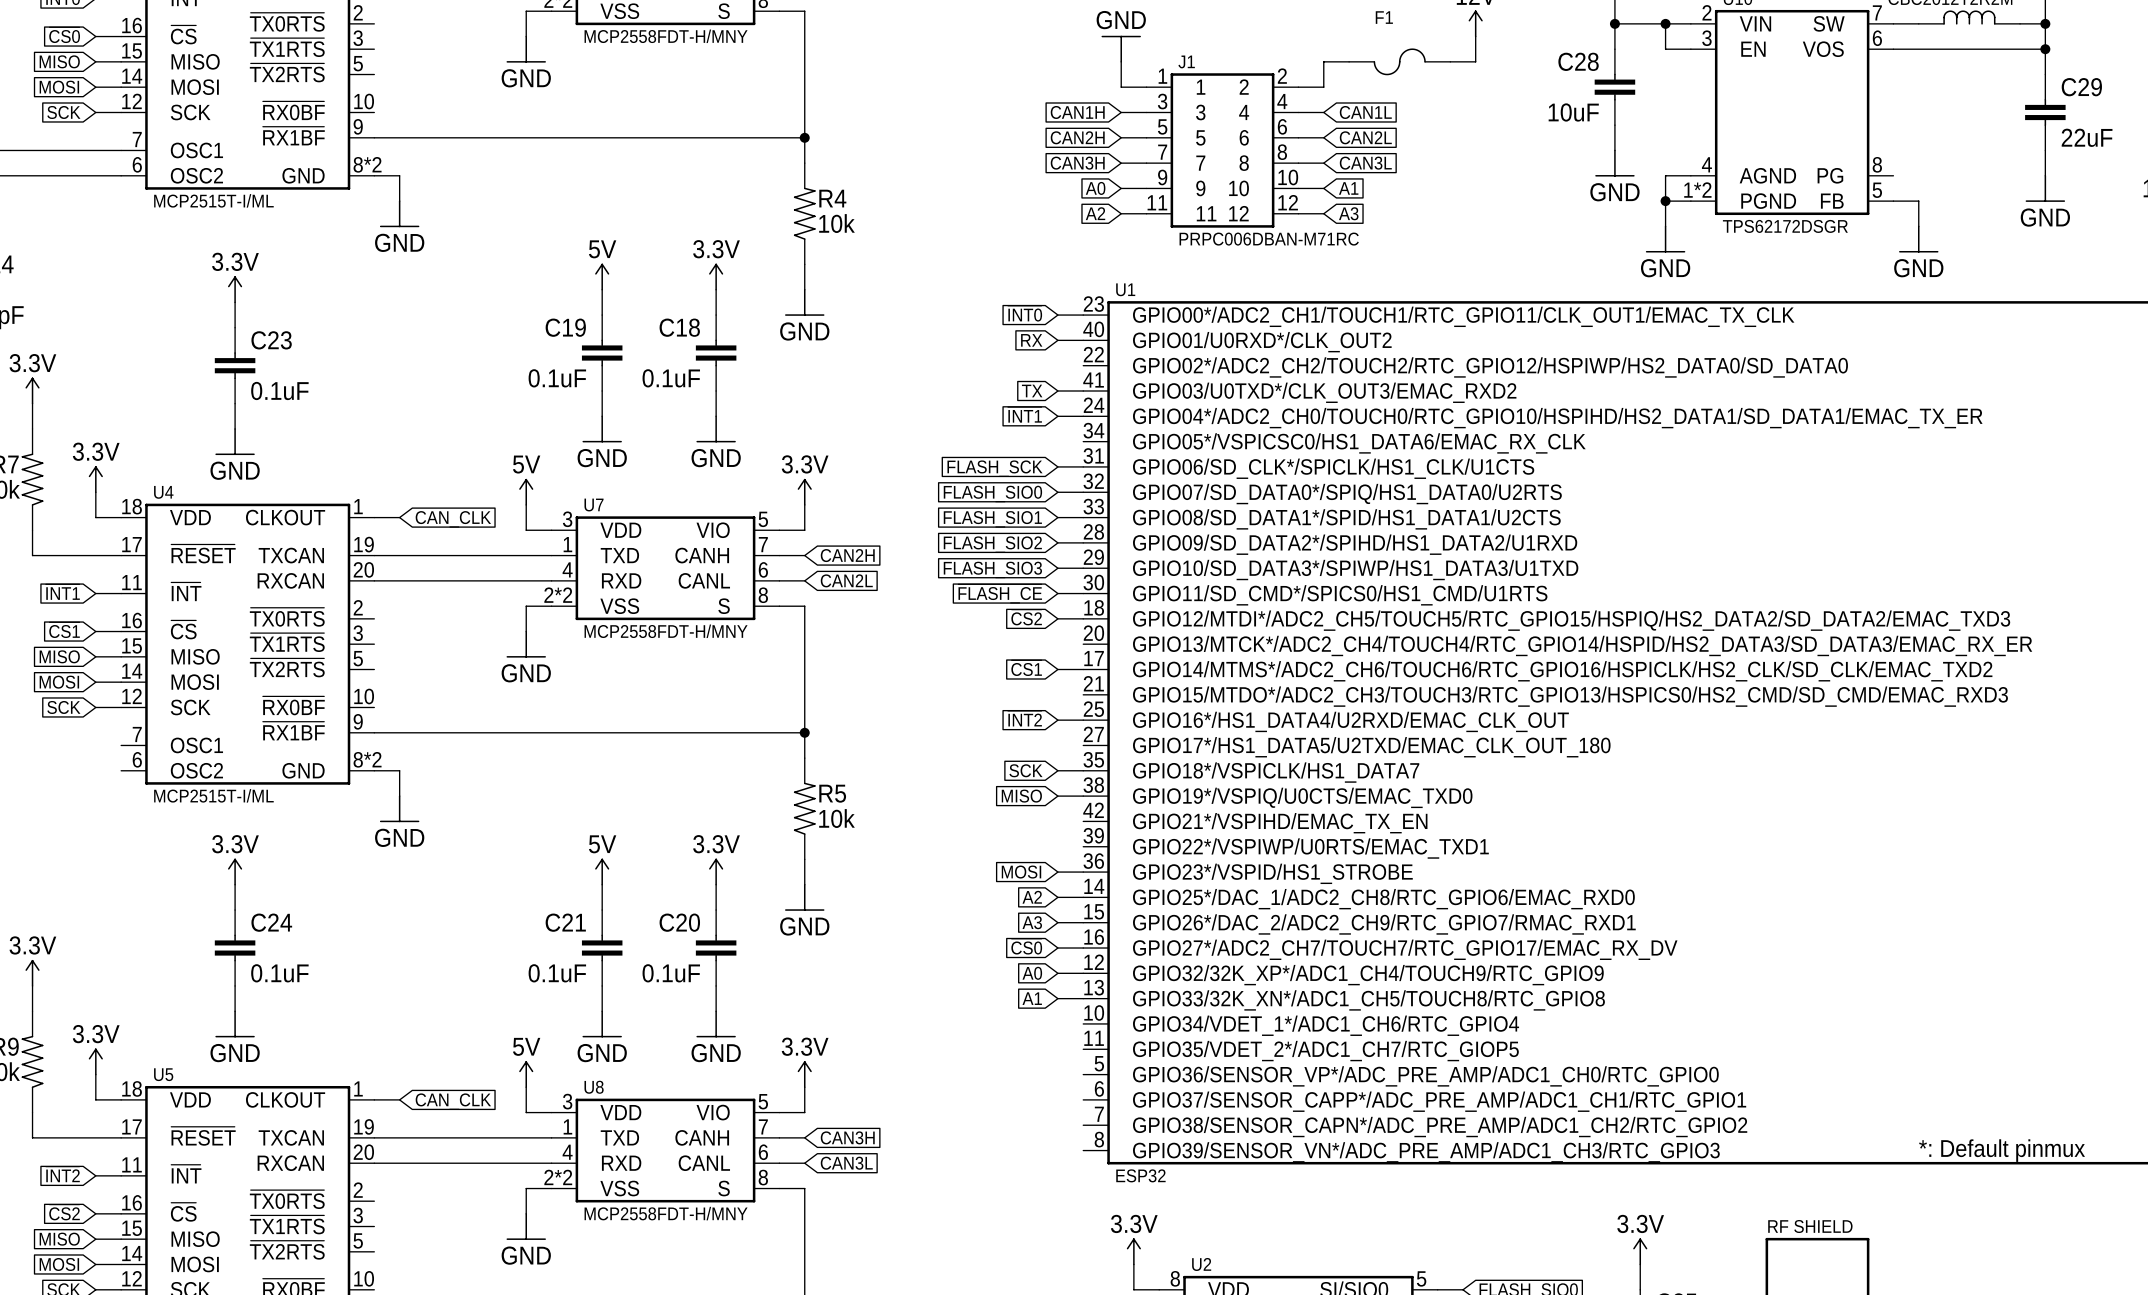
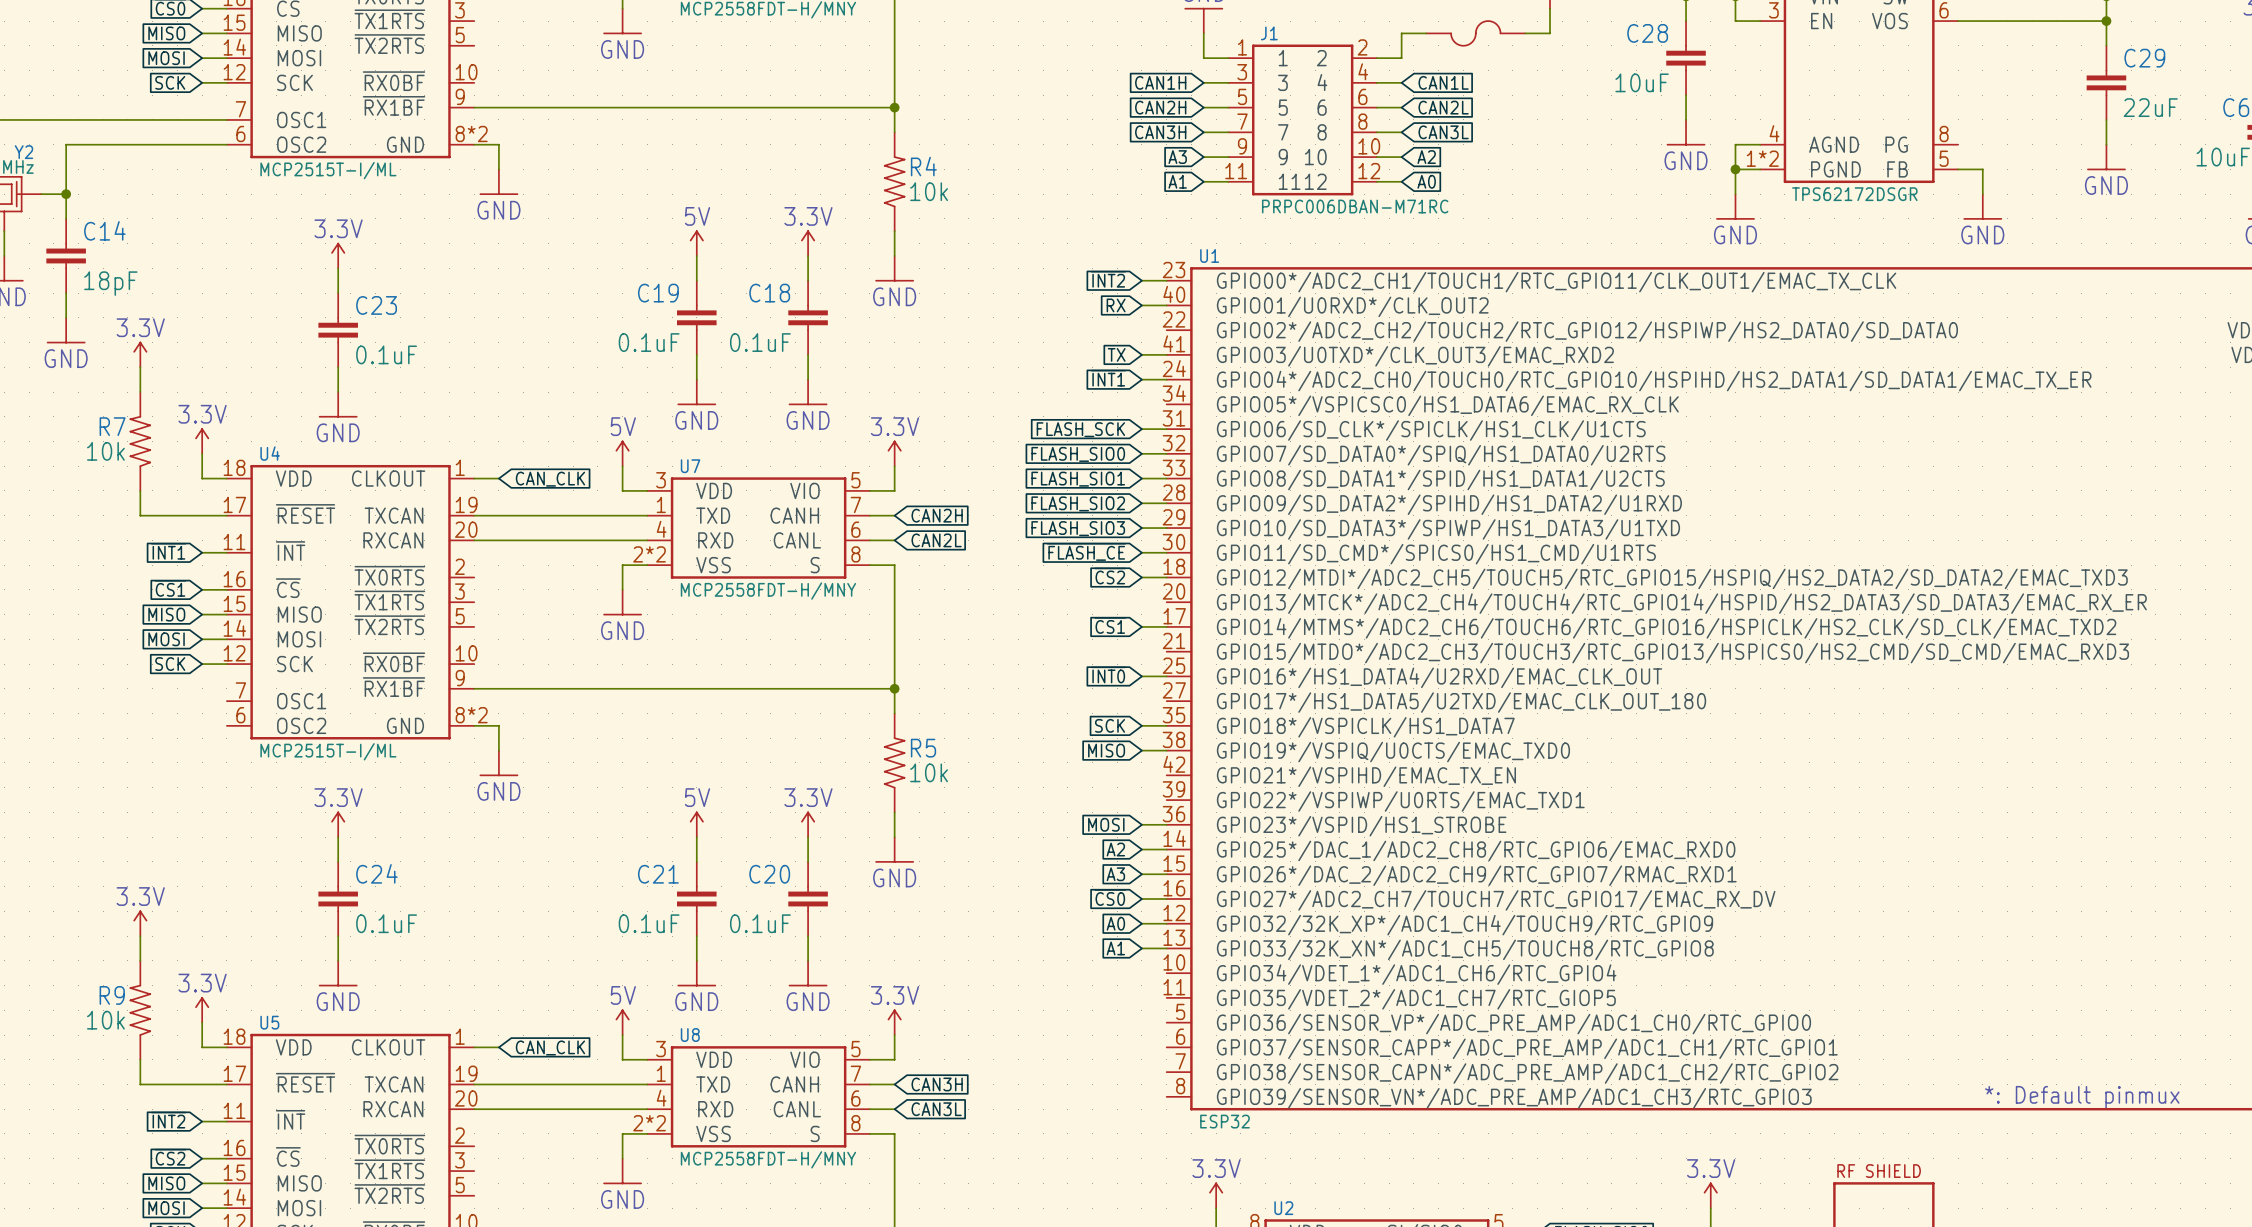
global label: A0 (1095, 188) -> A3 (1177, 157)
global label: A1 (1348, 188) -> A2 (1426, 157)
global label: A2 (1095, 213) -> A1 (1177, 181)
global label: A3 (1348, 213) -> A0 (1426, 181)
global label: ~{INT0} (1025, 313) -> ~{INT2} (1108, 279)
global label: ~{INT2} (1024, 718) -> ~{INT0} (1108, 674)

